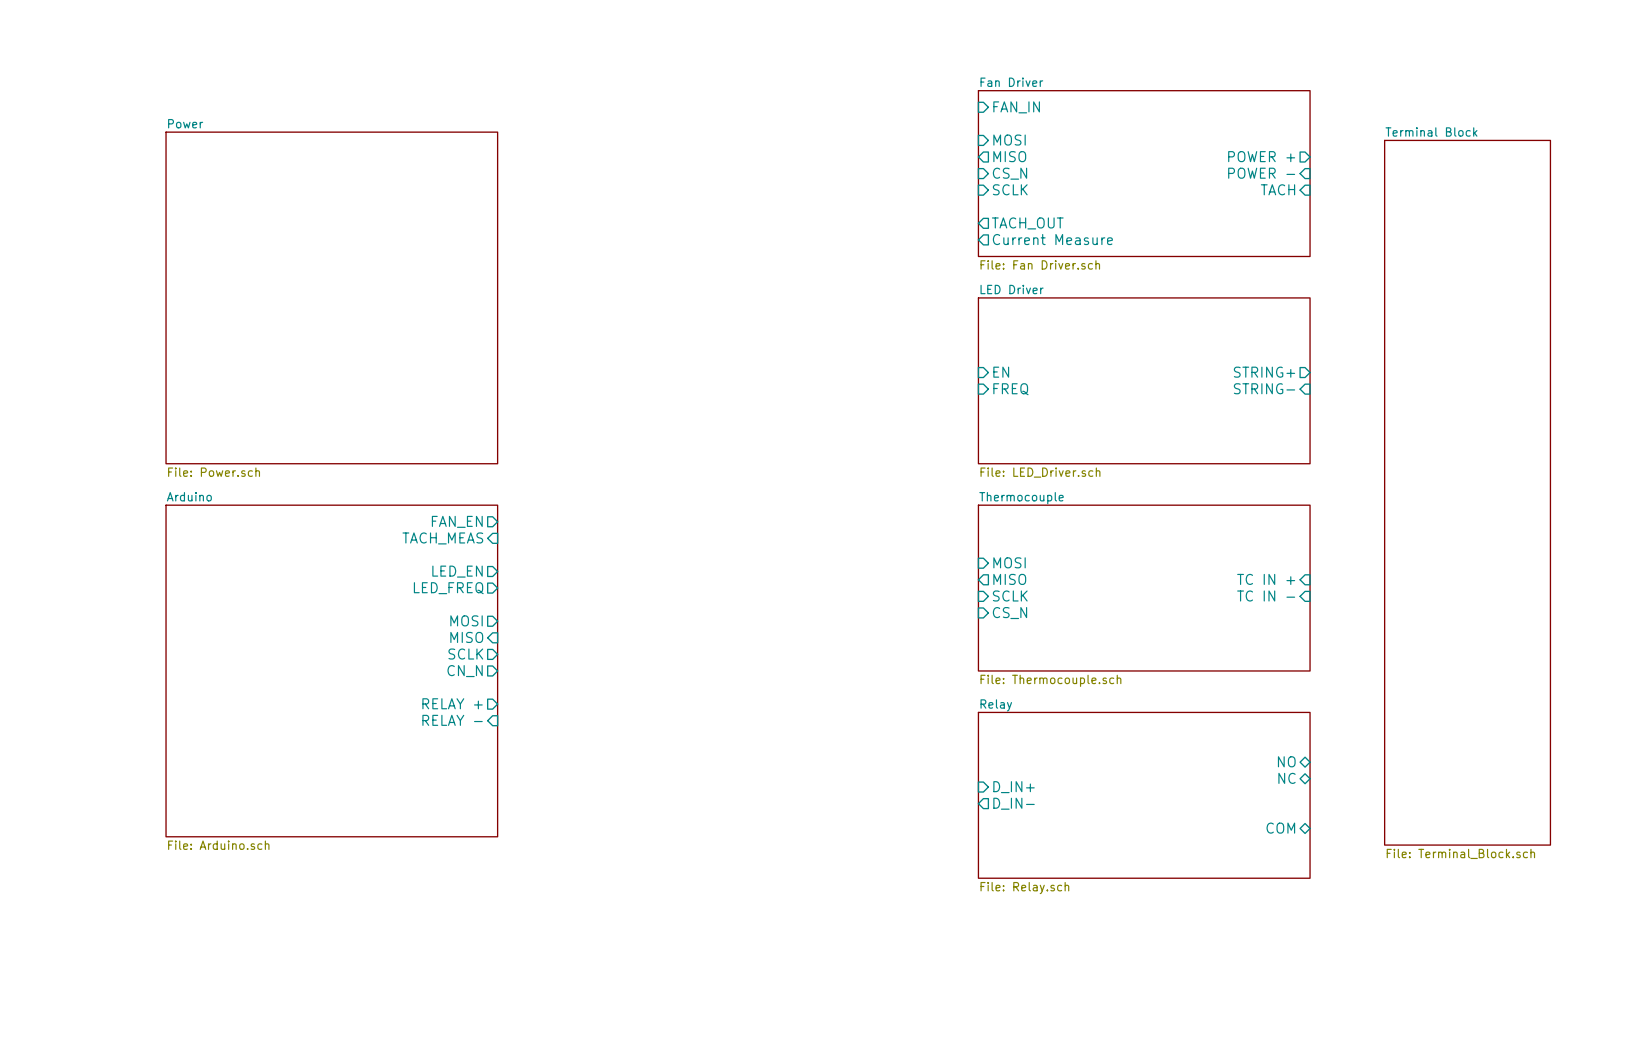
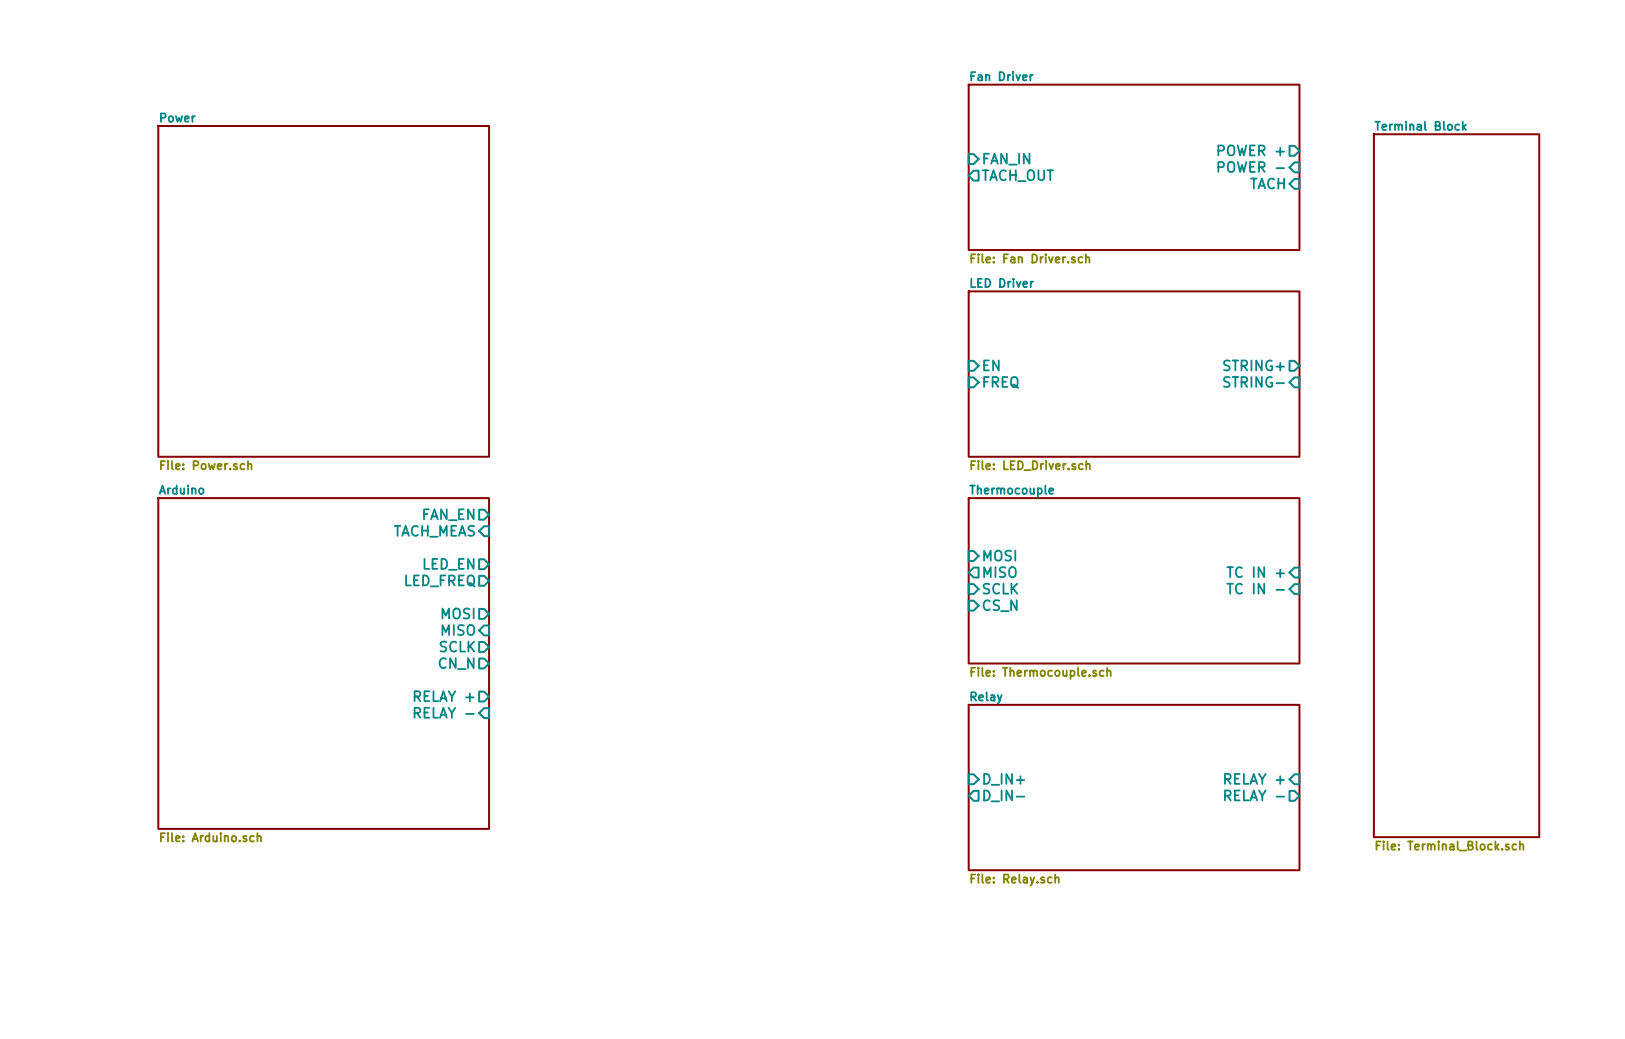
sheet pin position: FAN_IN (1016, 107) -> FAN_IN (1006, 159)
sheet pin: MOSI (1009, 140) -> none
sheet pin: MISO (1009, 156) -> none
sheet pin: CS_N (1010, 173) -> none
sheet pin: SCLK (1010, 189) -> none
sheet pin position: TACH_OUT (1027, 223) -> TACH_OUT (1017, 175)
sheet pin: Current Measure (1052, 239) -> none
sheet pin: NO (1286, 761) -> none
sheet pin: NC (1286, 778) -> none
sheet pin: none -> RELAY + (1254, 778)
sheet pin: none -> RELAY - (1254, 795)
sheet pin: COM (1280, 828) -> none

